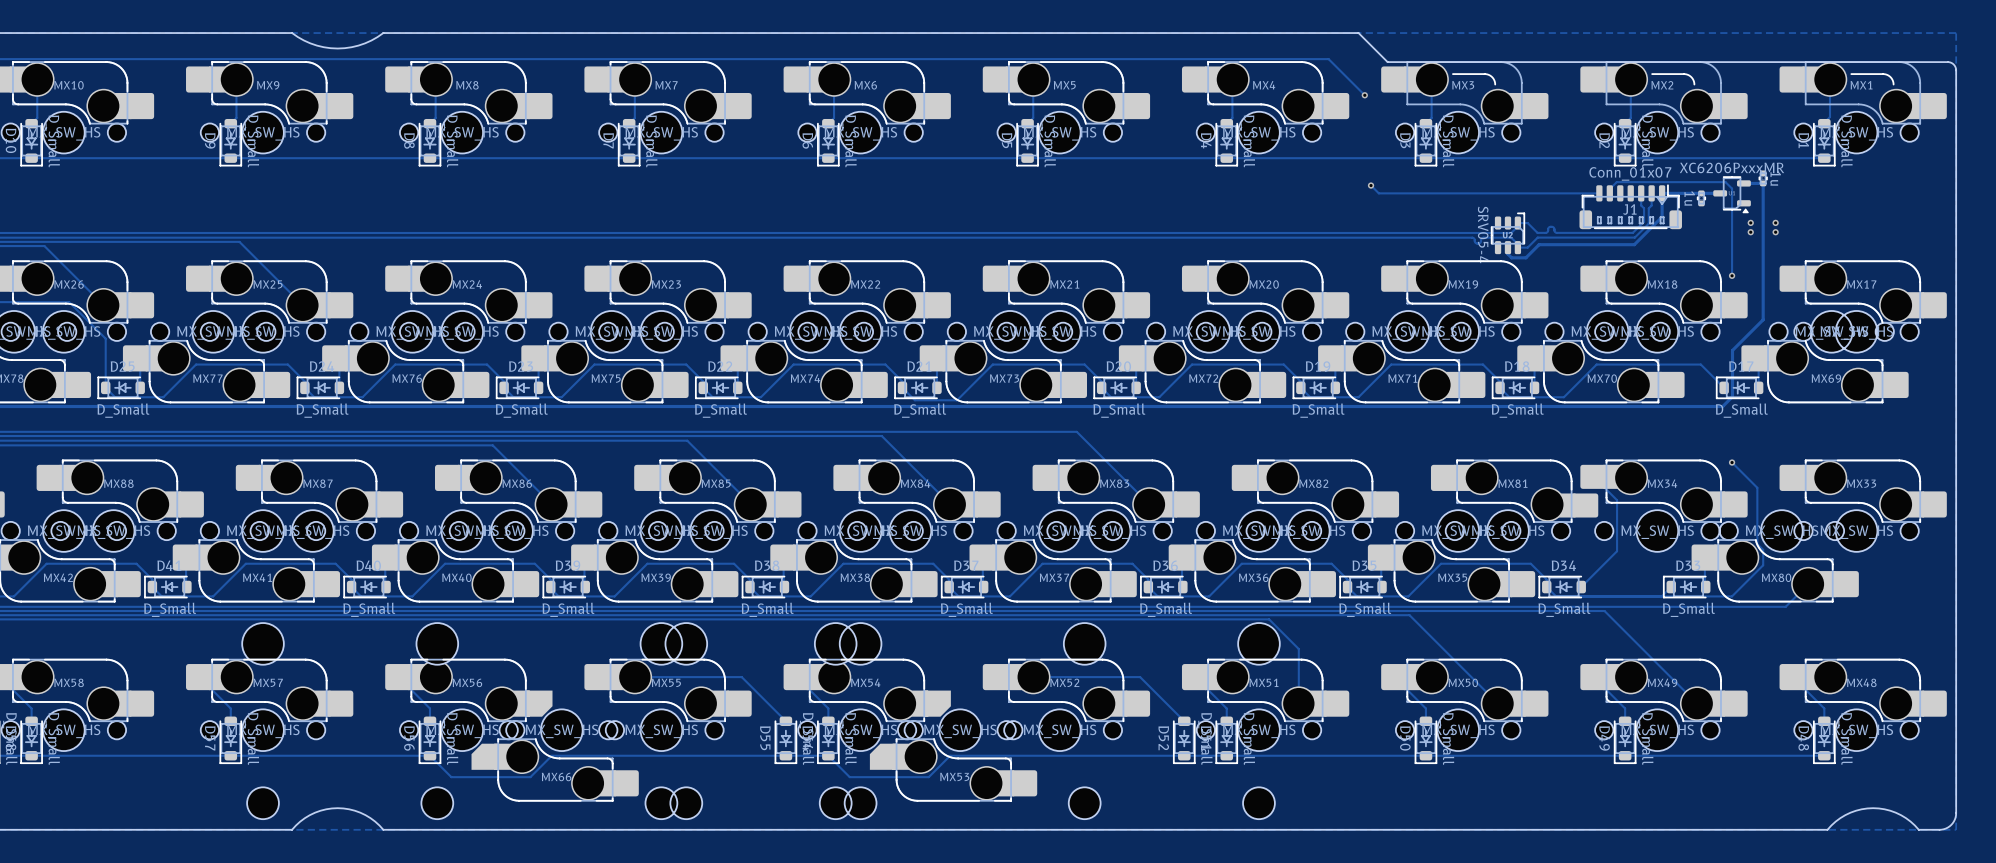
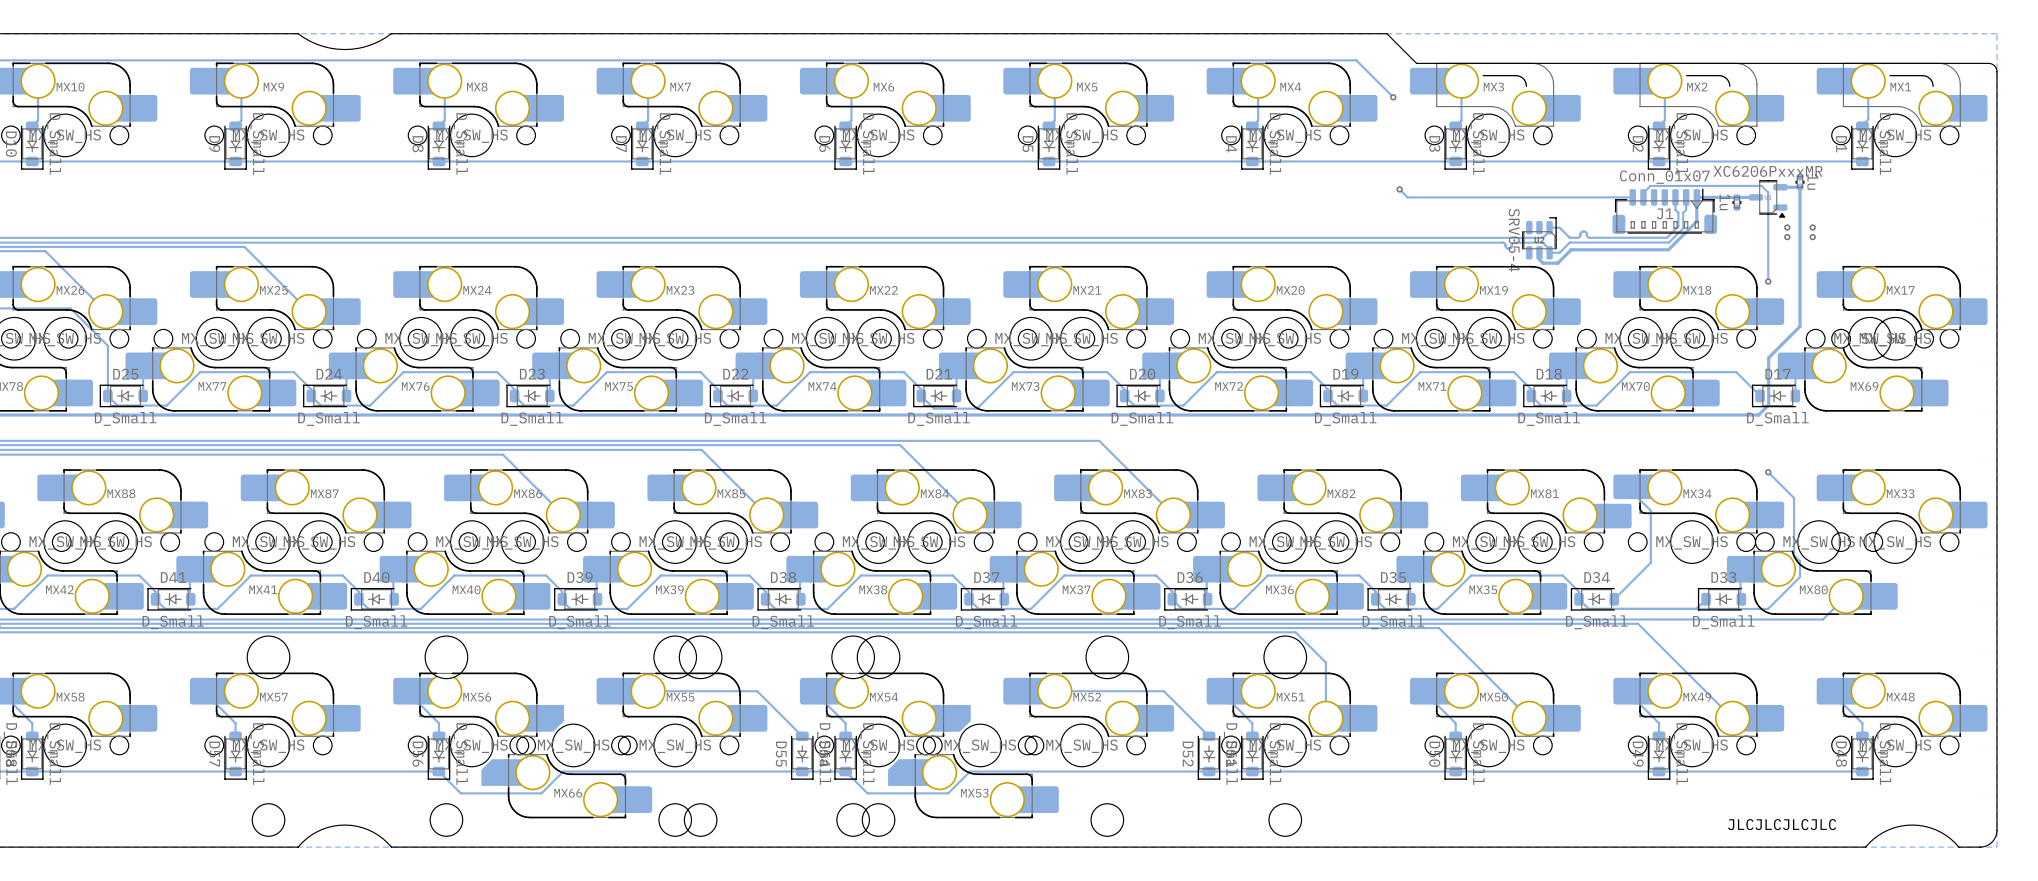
text: none -> JLCJLCJLCJLC (1782, 824)

